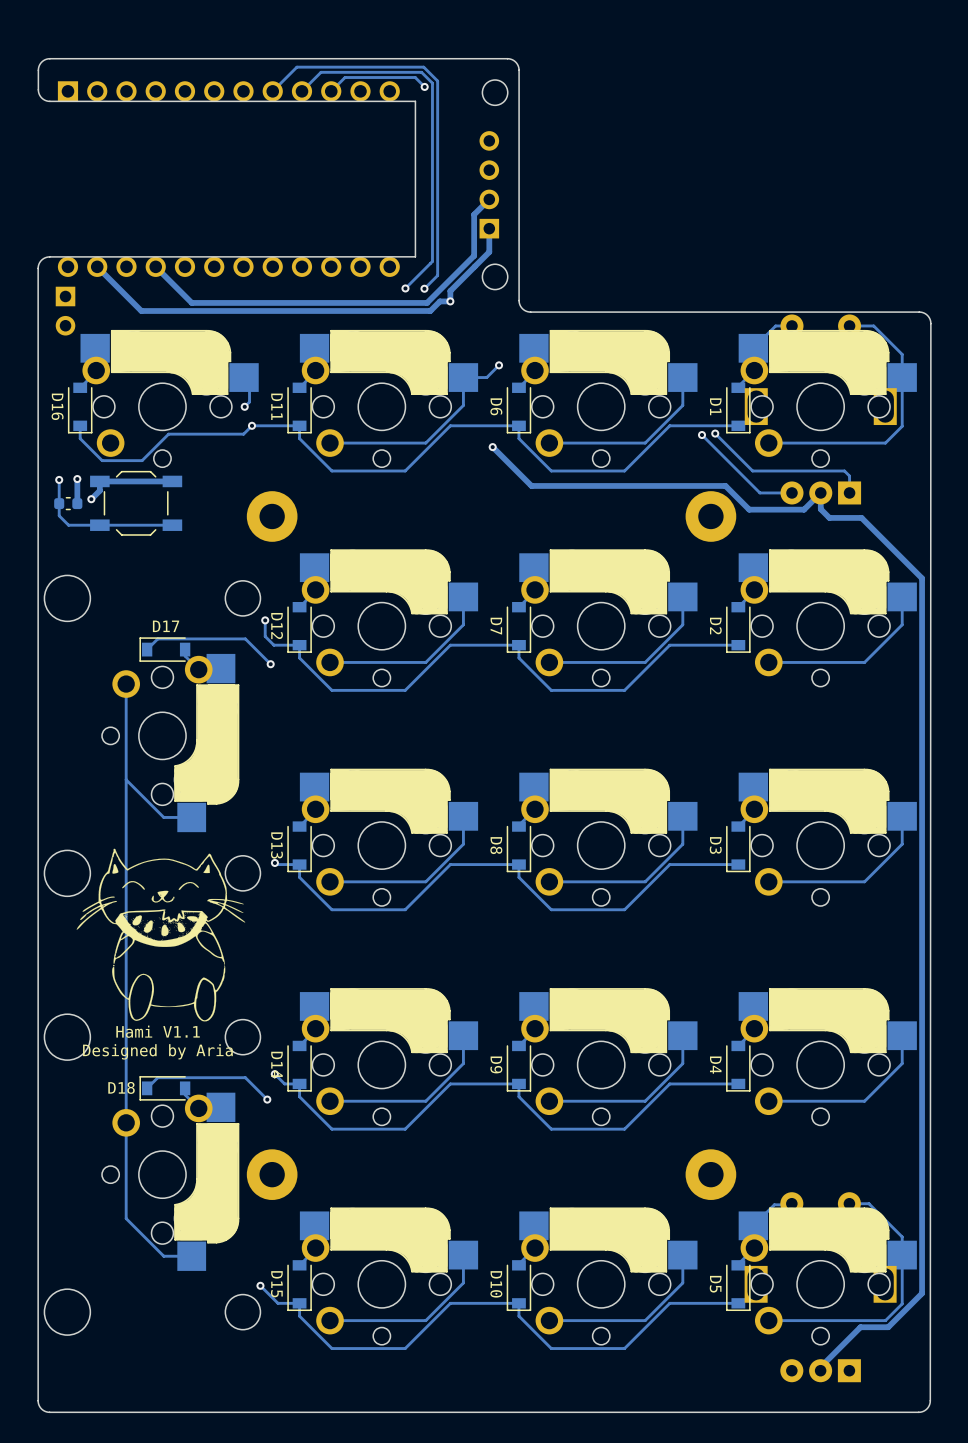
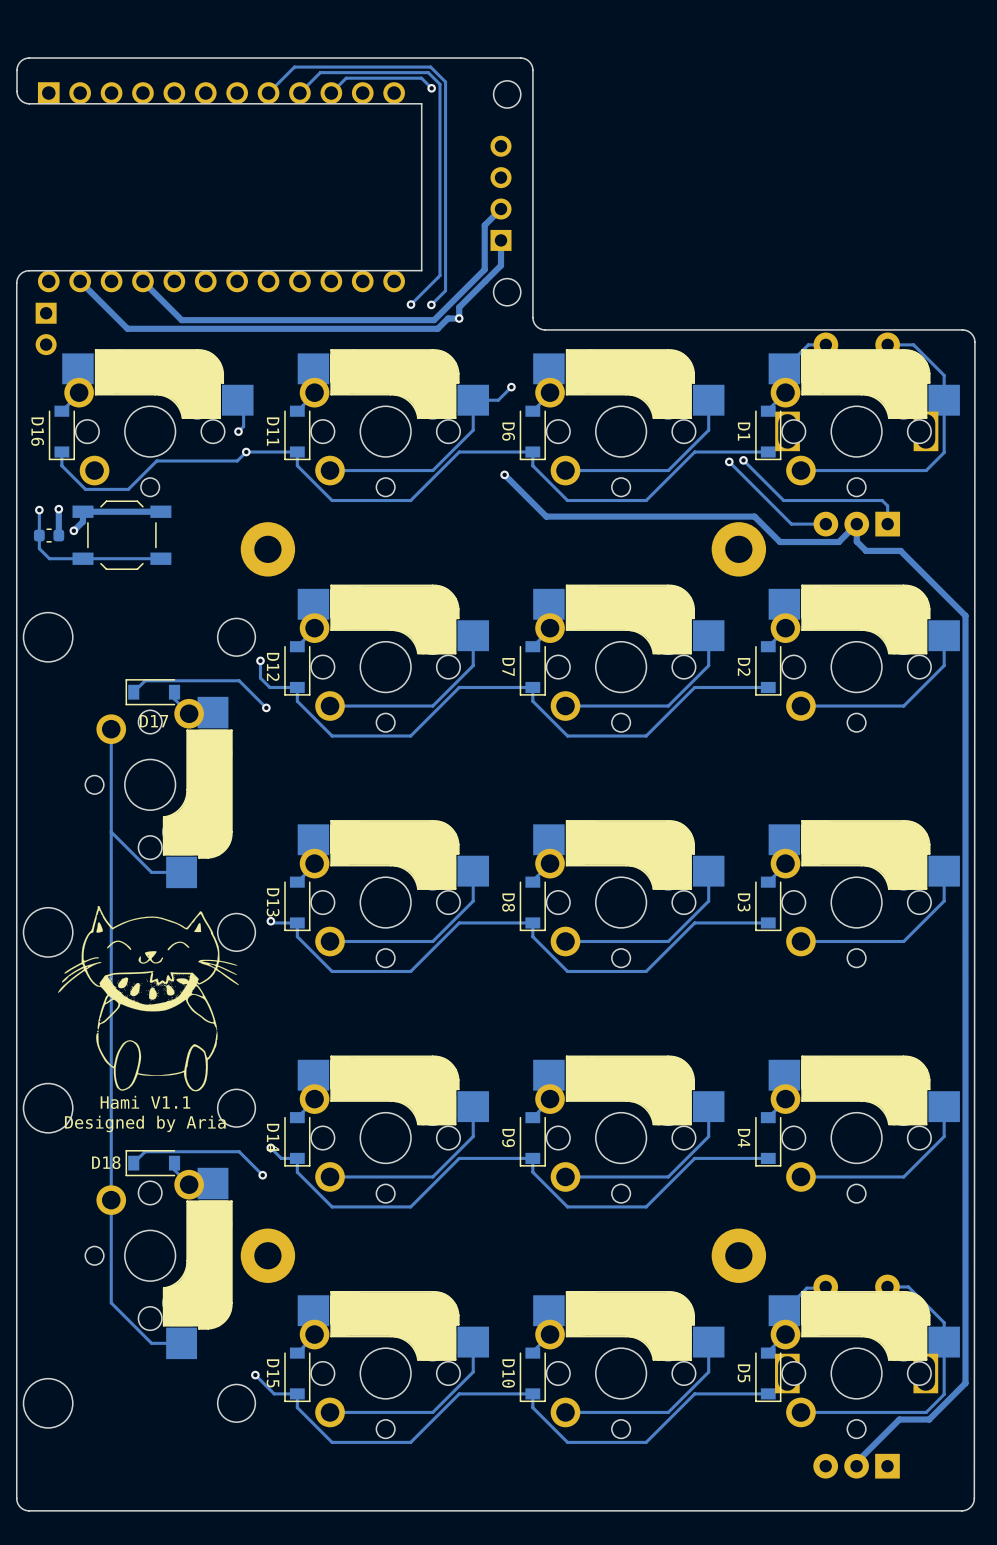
D17 name position: D17 (166, 626) -> D17 (154, 721)

